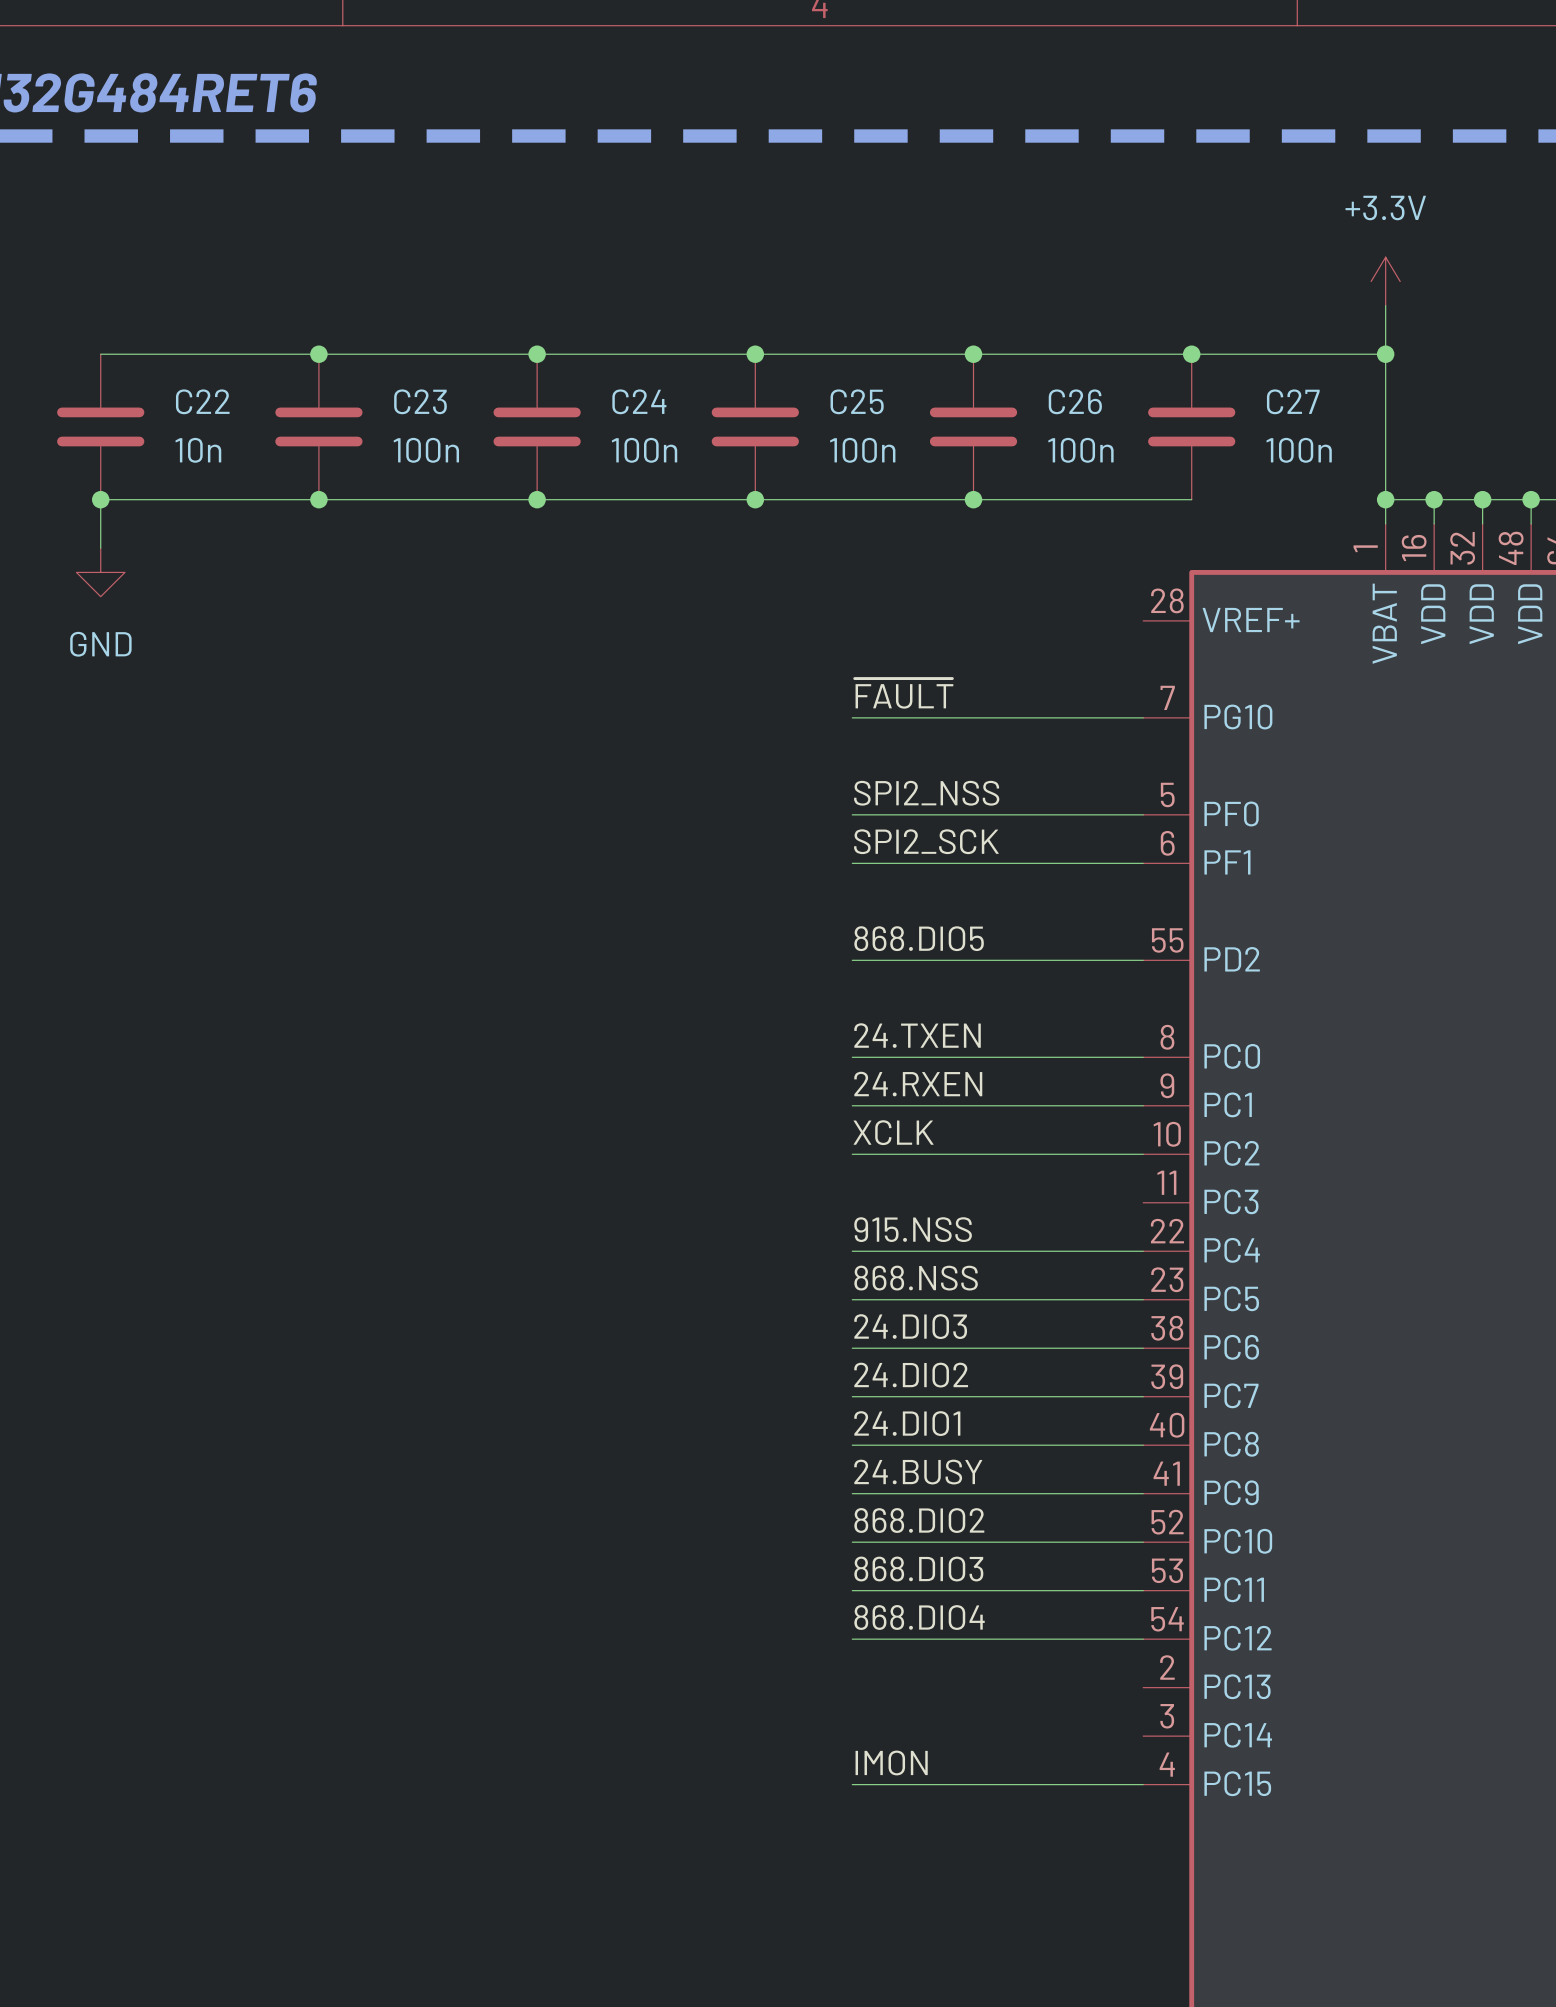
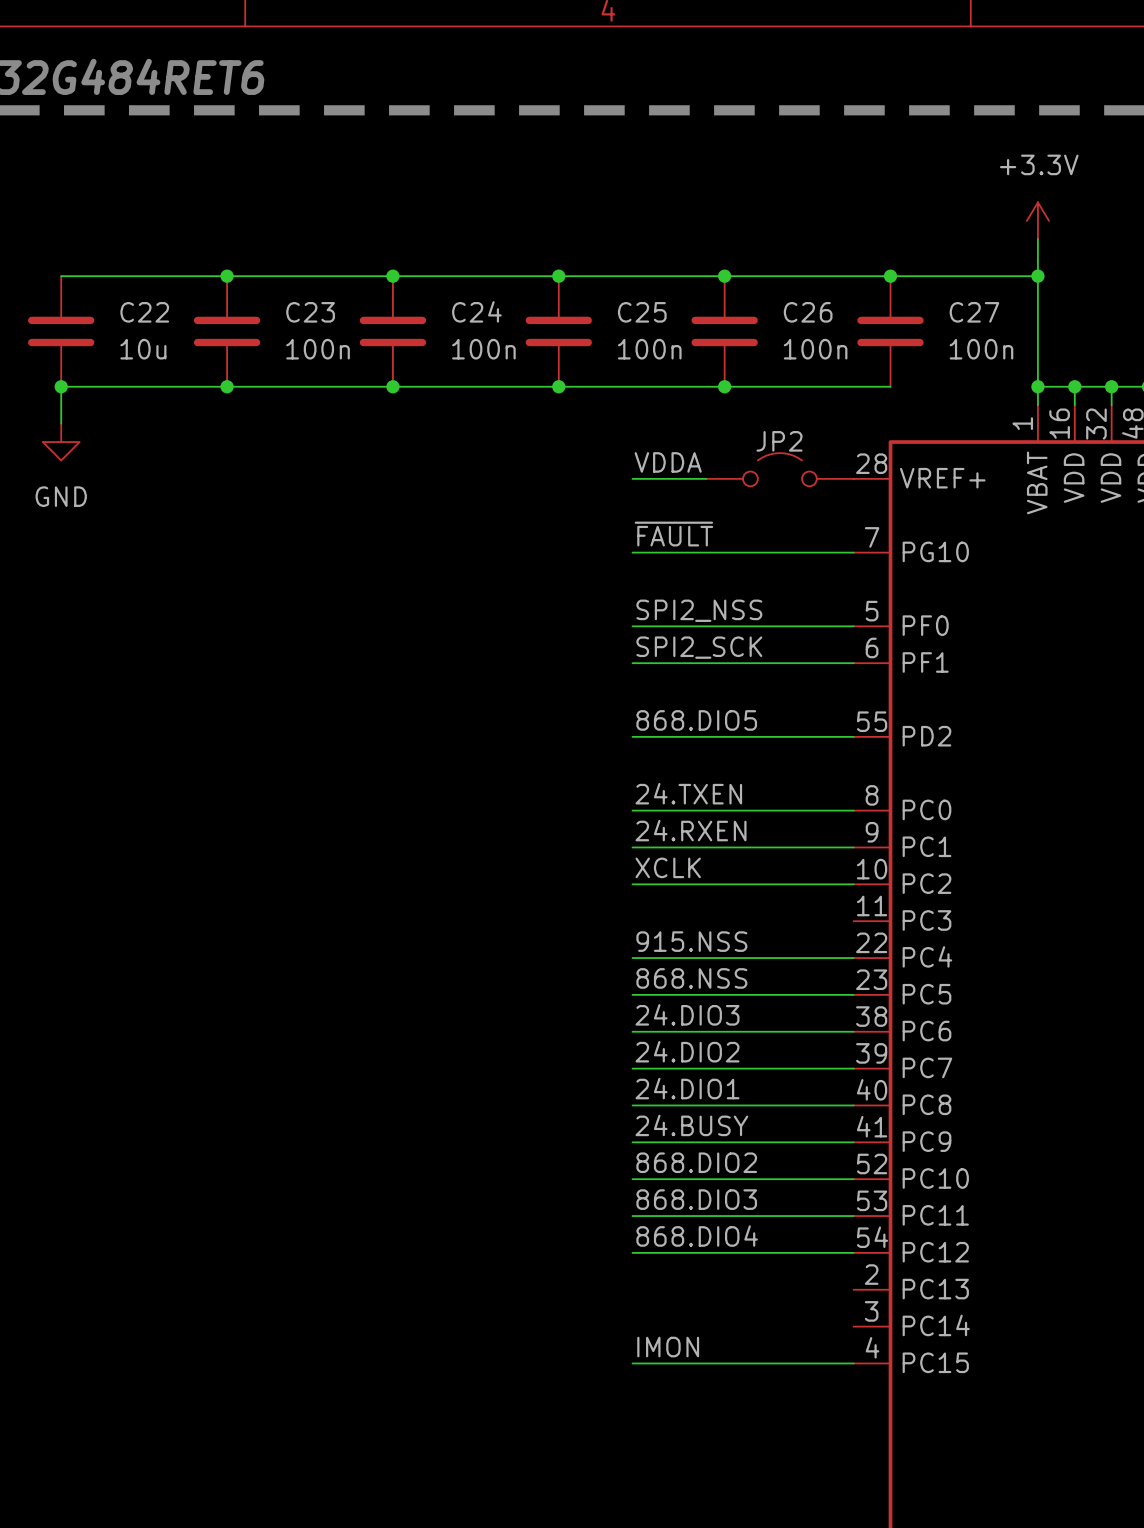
C22 value: 10n (198, 450) -> 10u (143, 349)
label: none -> VDDA (668, 462)
JP2: none -> (779, 469)
wire: none -> (632, 478) (706, 478)

